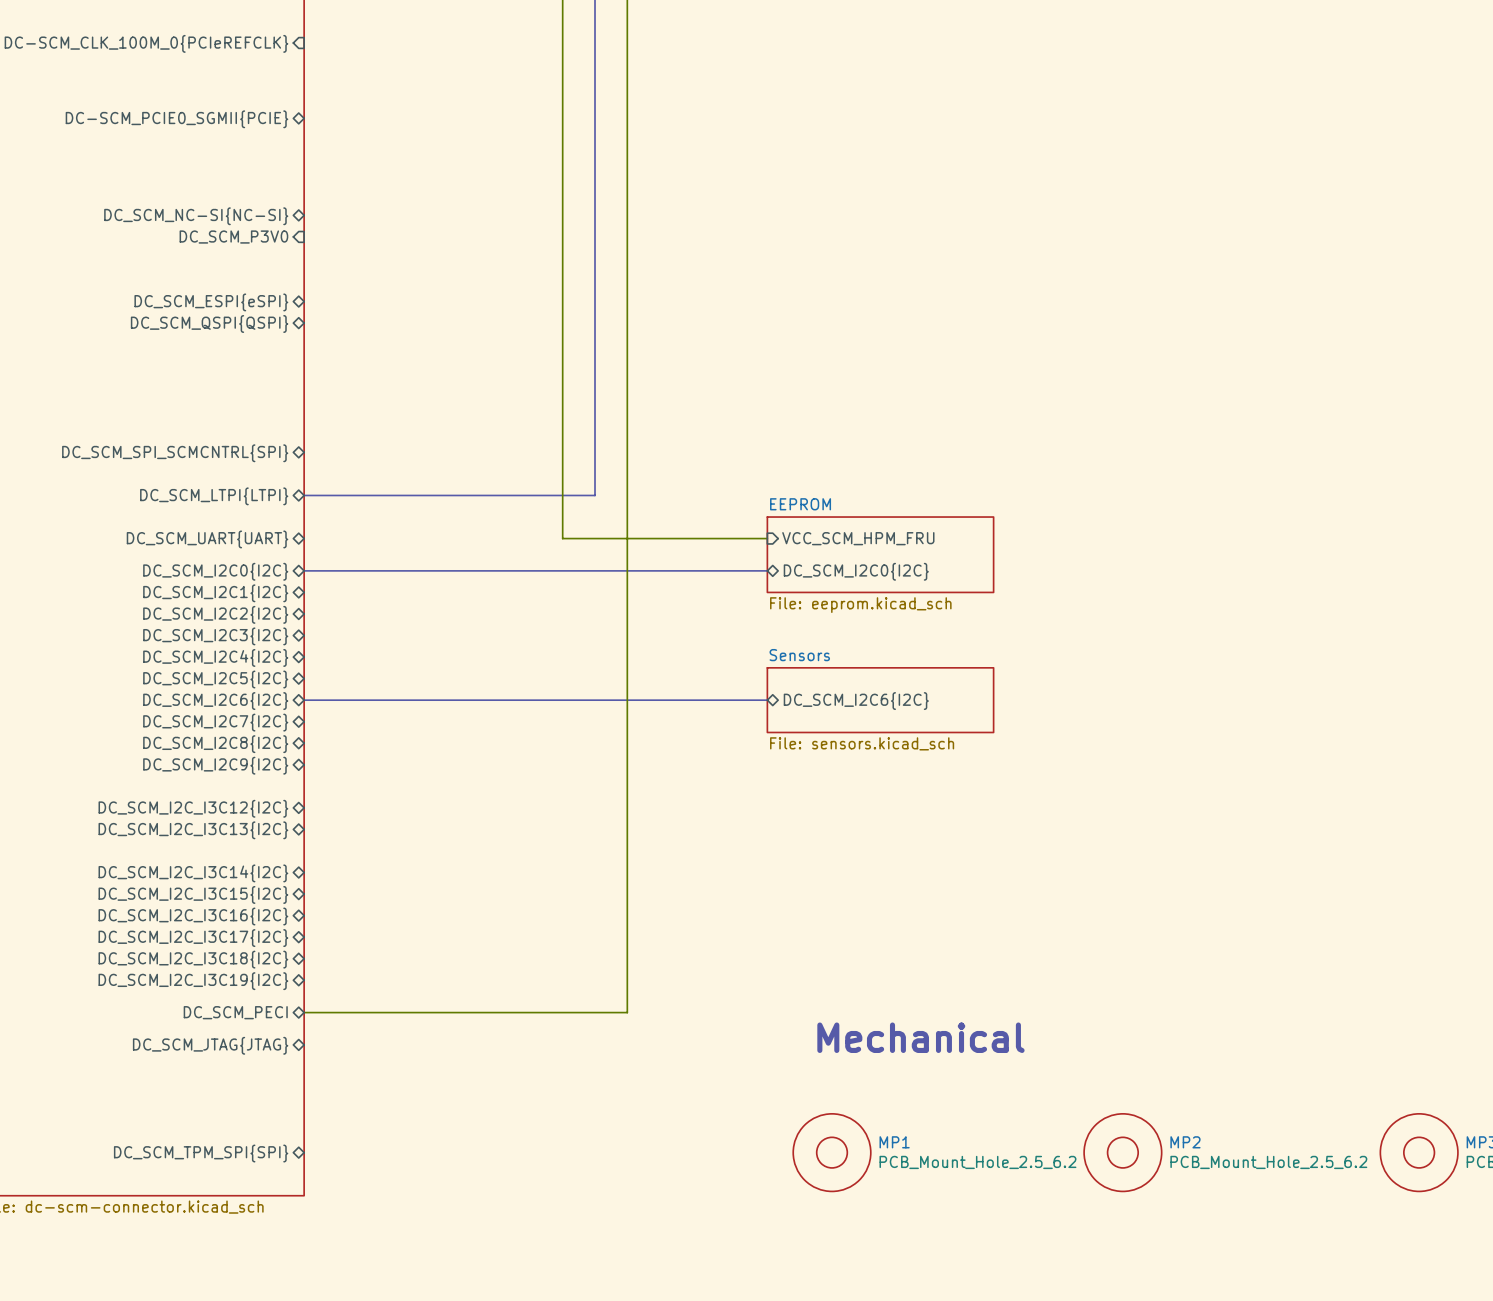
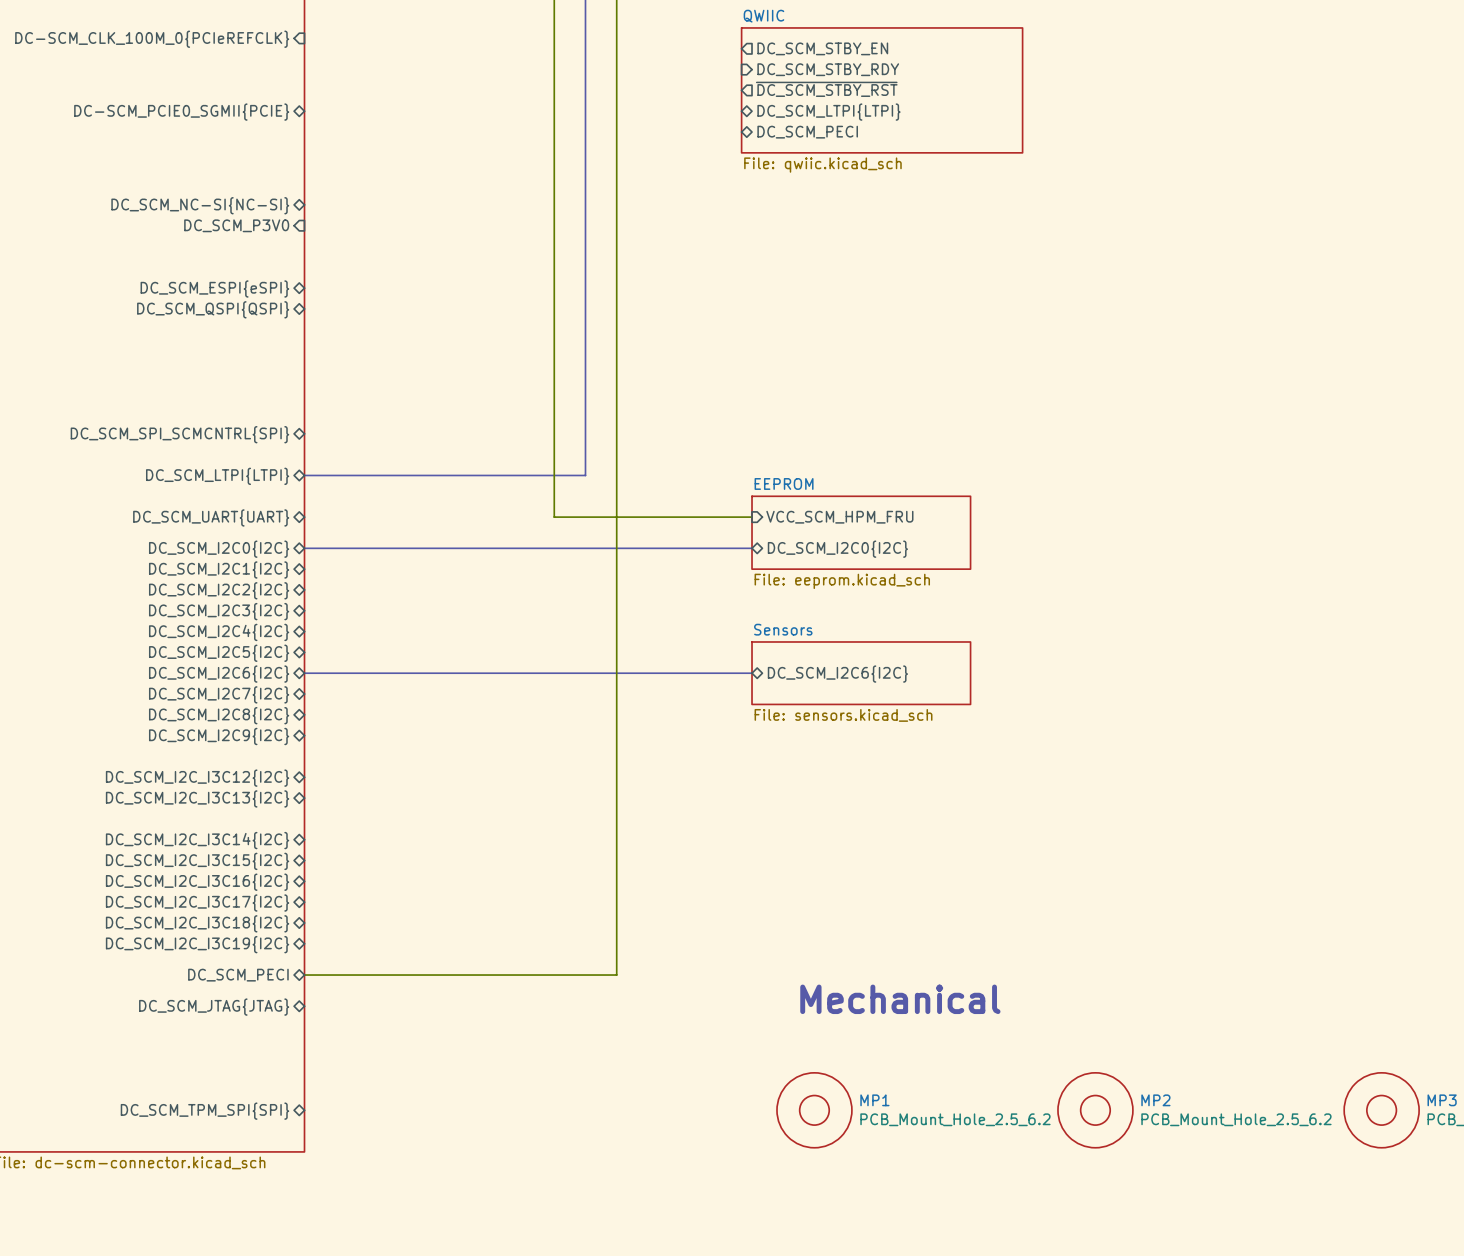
sheet pin: none -> DC_SCM_STBY_EN (822, 48)
sheet pin: none -> DC_SCM_STBY_RDY (828, 69)
sheet pin: none -> ~{DC_SCM_STBY_RST} (826, 89)
sheet QWIIC: none -> File: qwiic.kicad_sch (882, 90)
sheet pin: none -> DC_SCM_LTPI{LTPI} (828, 112)
sheet pin: none -> DC_SCM_PECI (807, 132)

